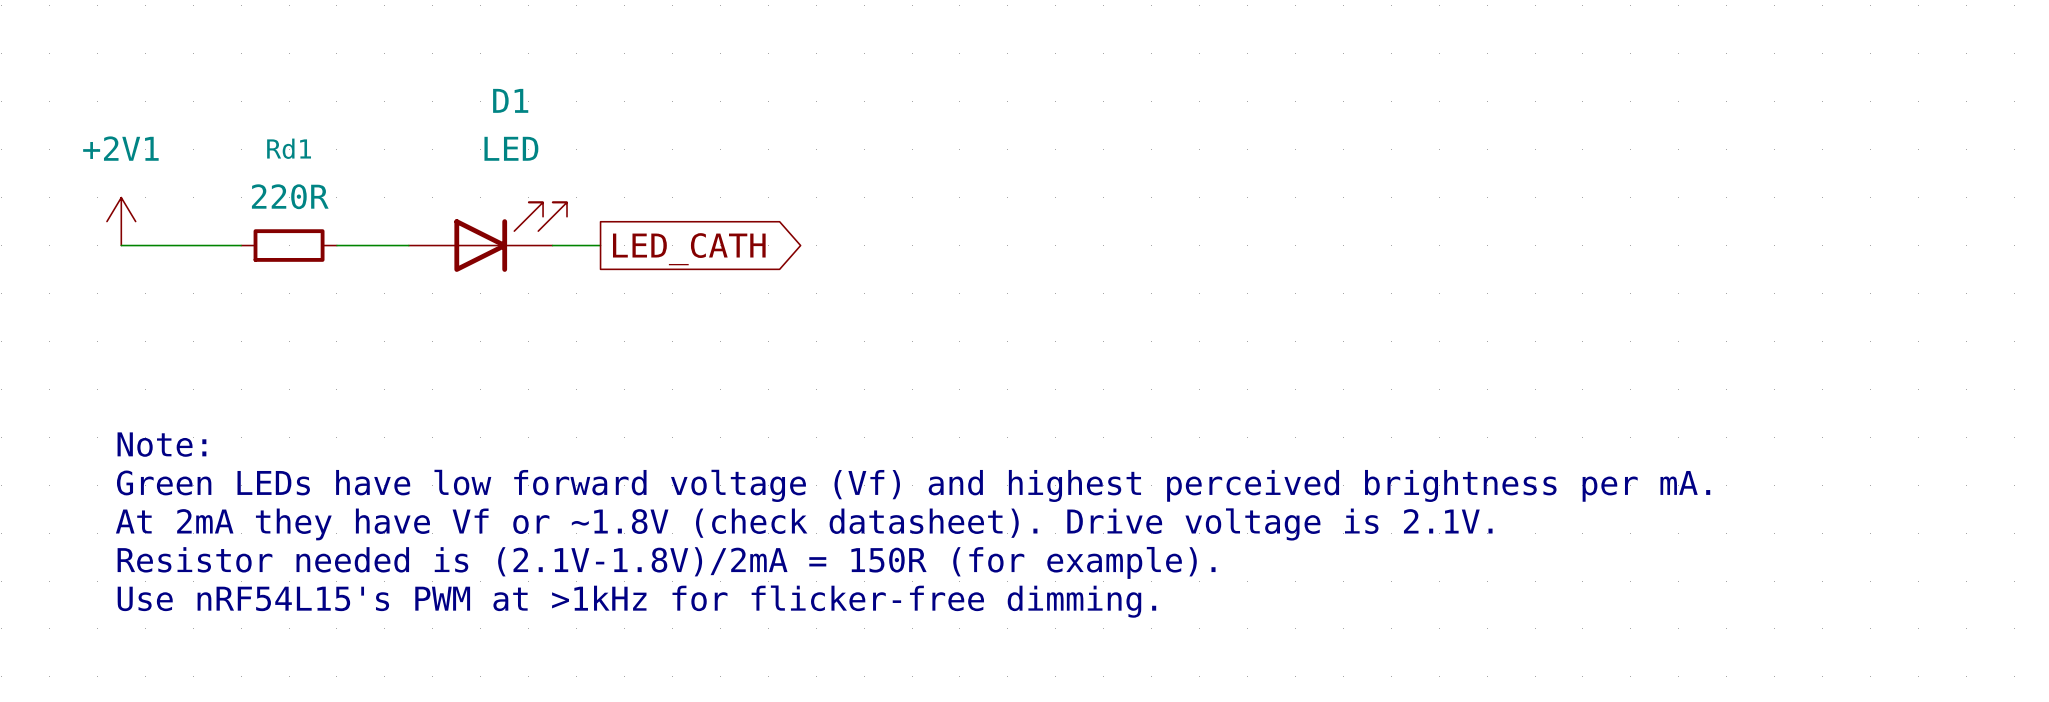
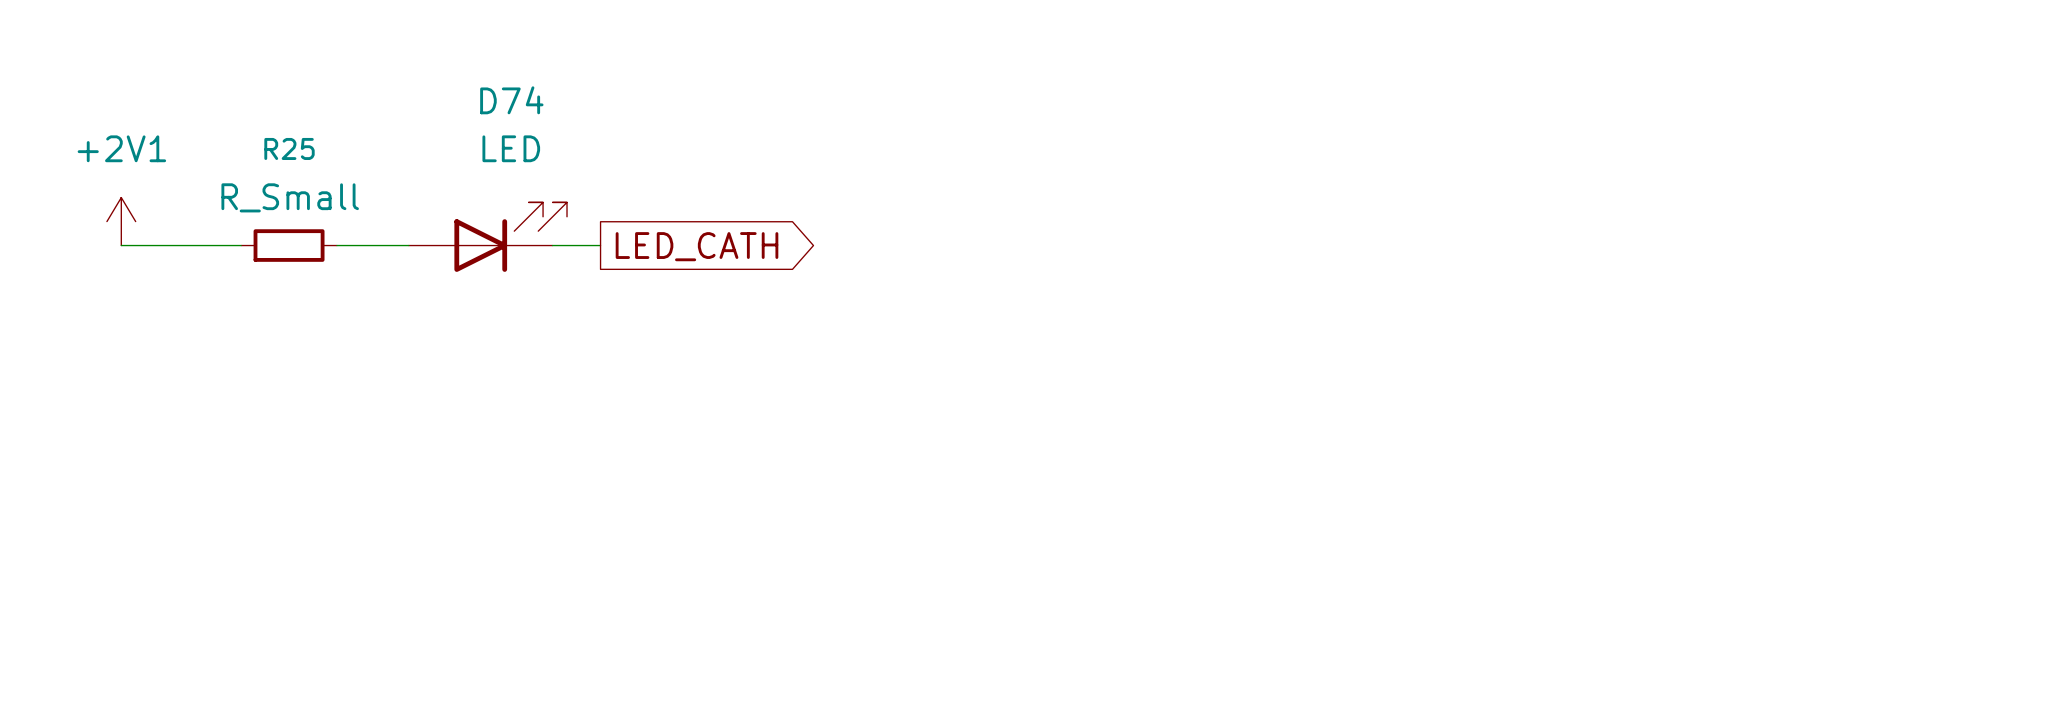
D1 name: D1 (510, 100) -> D74 (511, 100)
Rd1 name: Rd1 (289, 148) -> R25 (289, 148)
Rd1 value: 220R (290, 196) -> R_Small (290, 197)
text: Note: (161, 444) -> none
text: Green LEDs have low forward voltage (Vf) and highest perceived brightness per mA. (913, 485) -> none
text: At 2mA they have Vf or ~1.8V (check datasheet). Drive voltage is 2.1V. (804, 524) -> none
text: Resistor needed is (2.1V-1.8V)/2mA = 150R (for example). (666, 562) -> none
text: Use nRF54L15's PWM at >1kHz for flicker-free dimming. (636, 601) -> none

